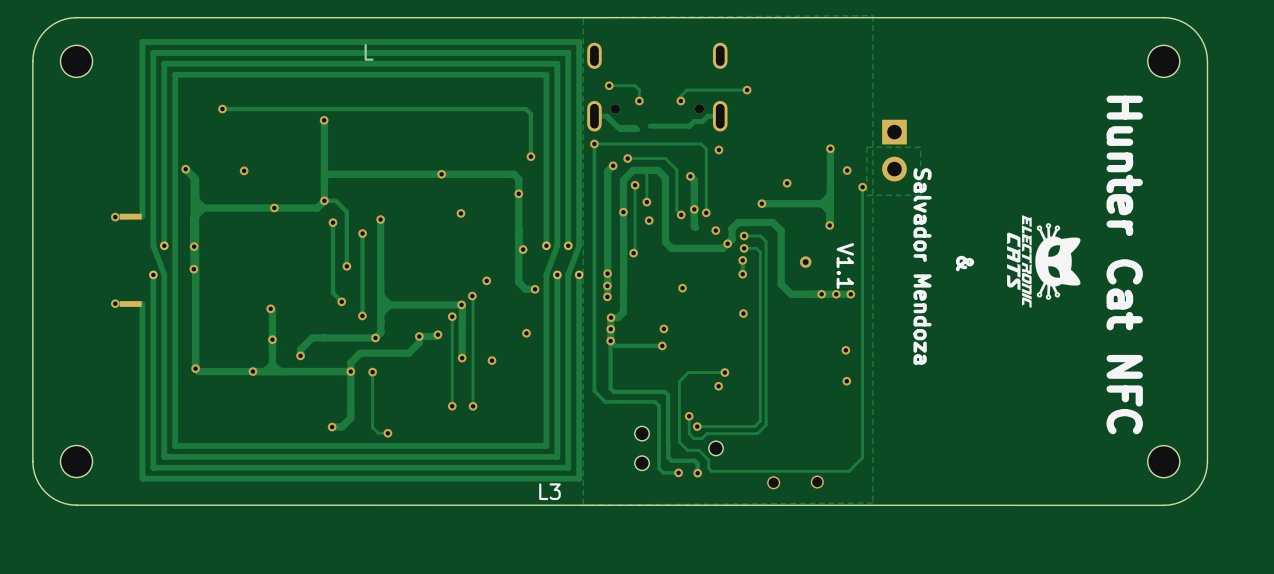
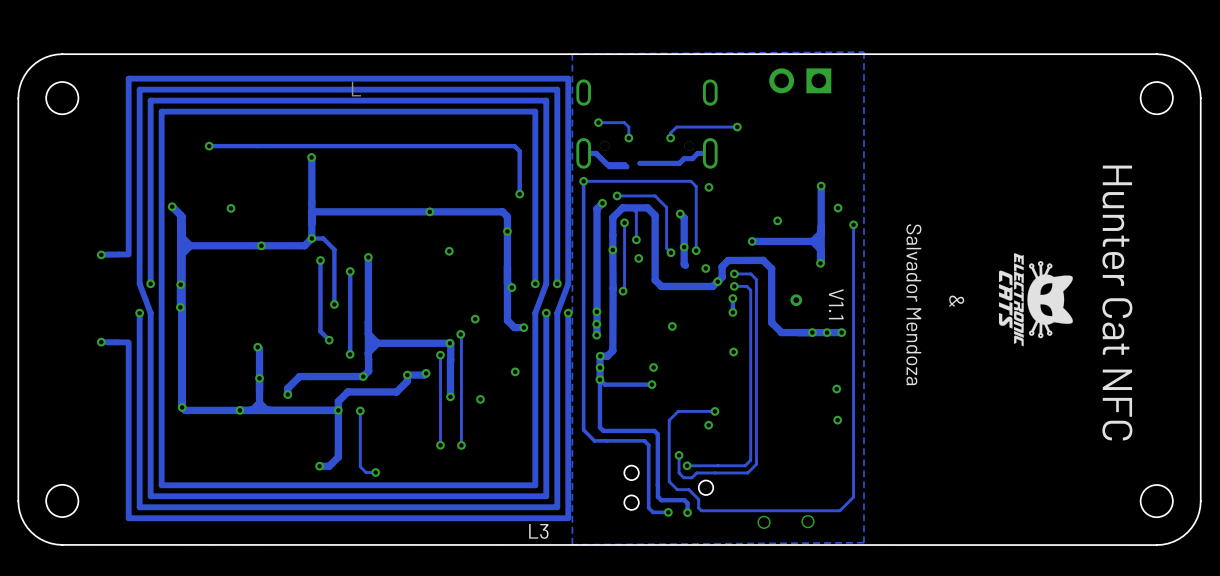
zone outline: (920, 147) (920, 195) (866, 195) (866, 147) (920, 147) -> none
part rotation: 0° (894, 150) -> 90° clockwise (800, 80)
part position: (894, 150) -> (800, 80)

